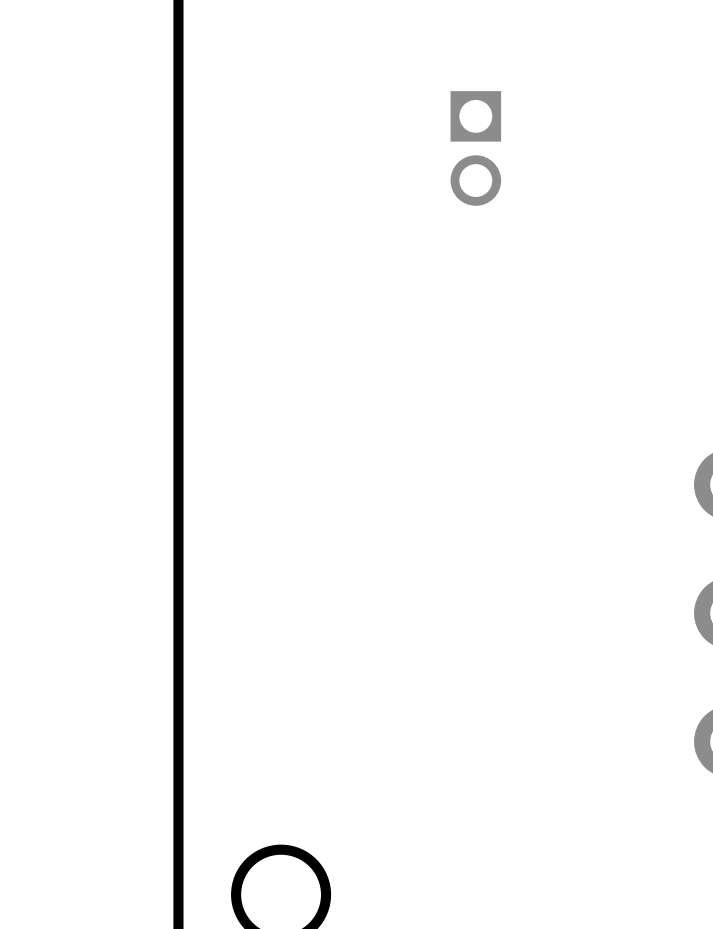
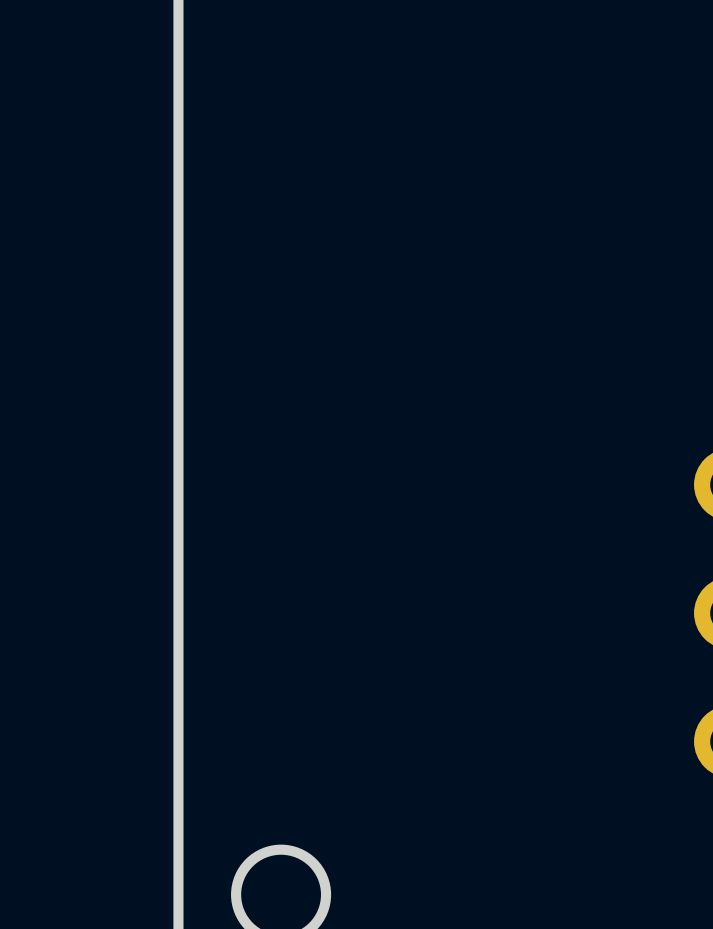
part: (475, 148) -> none

